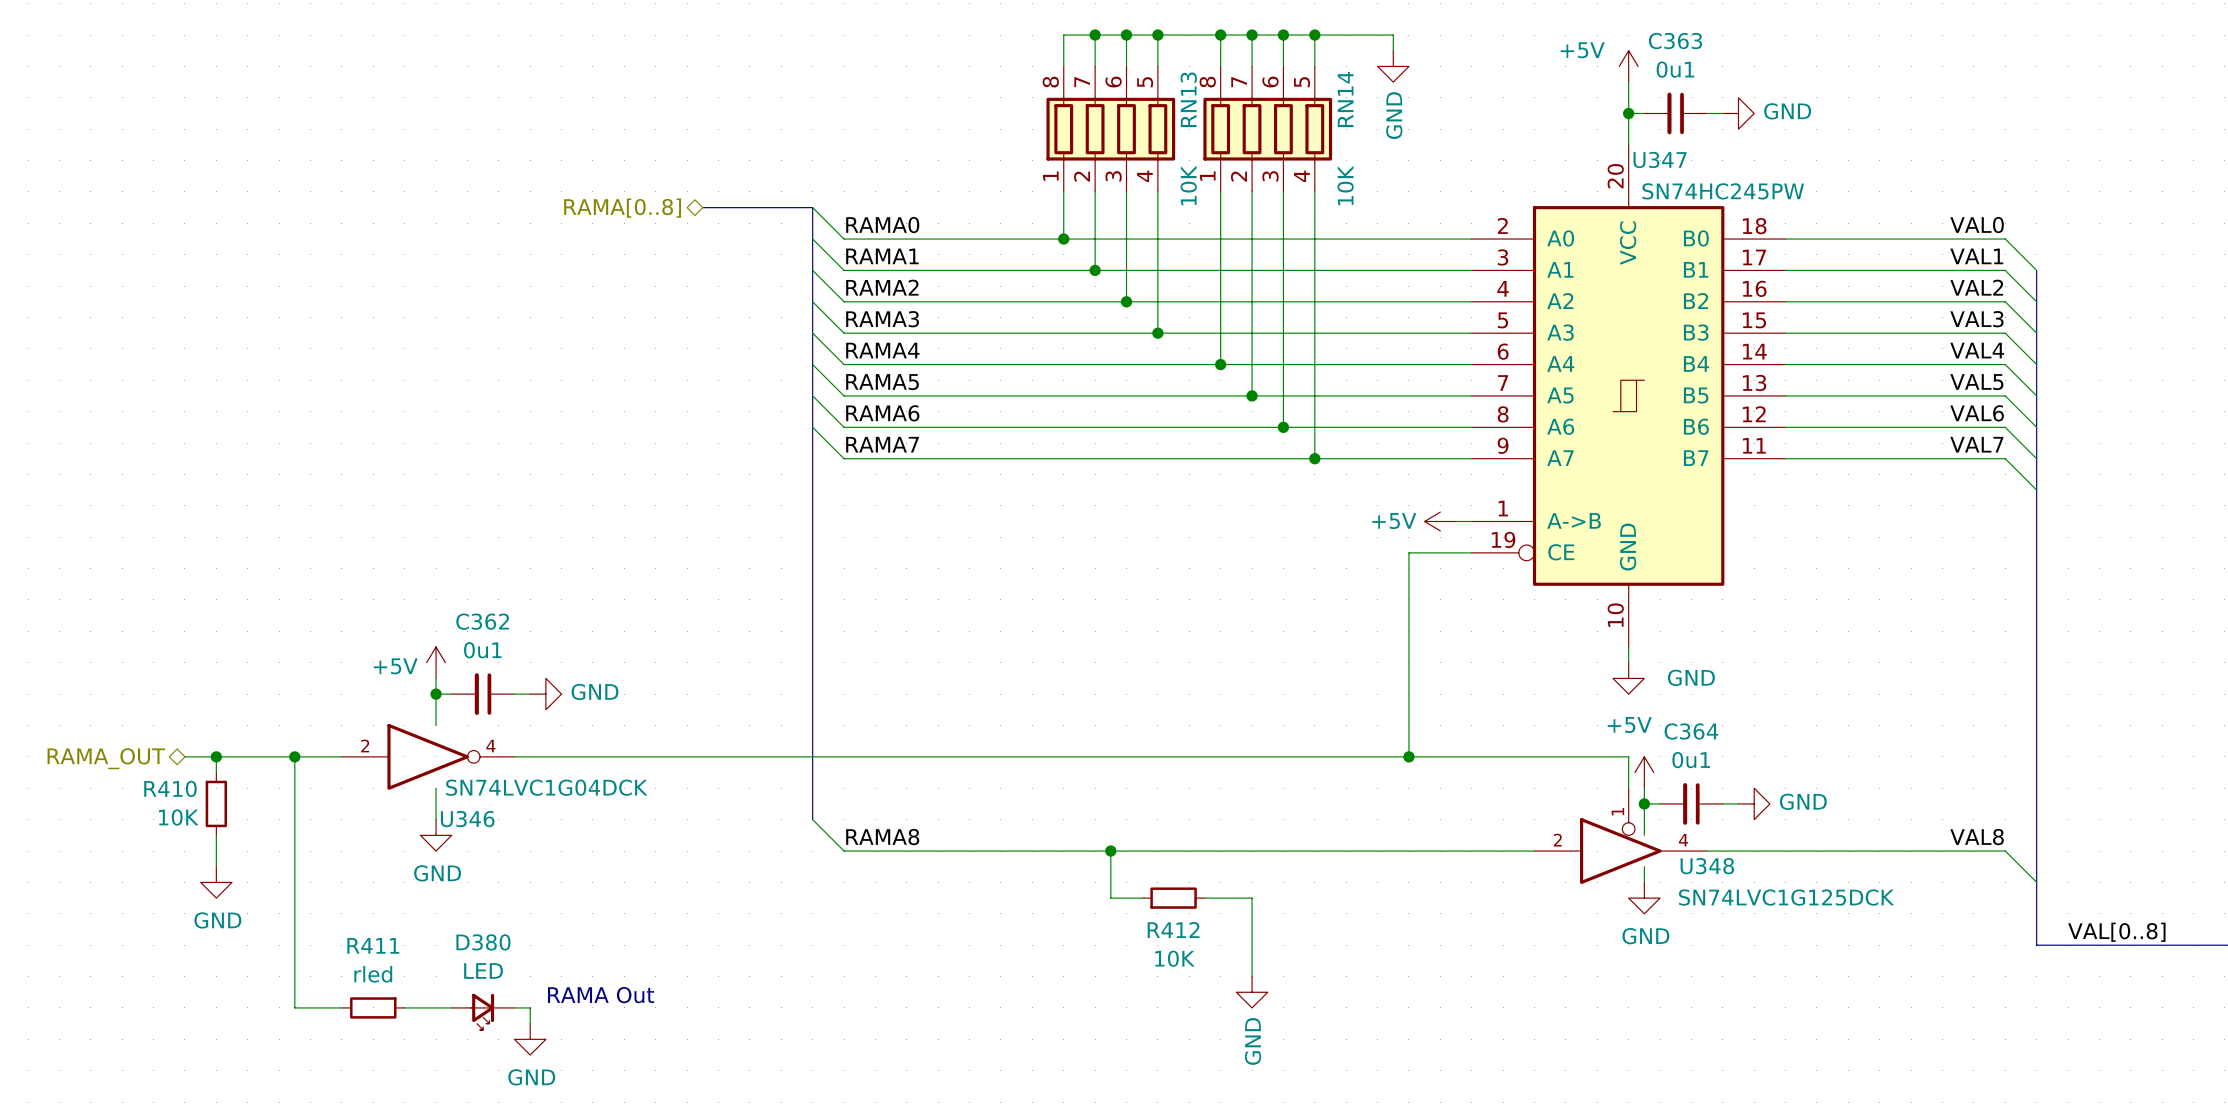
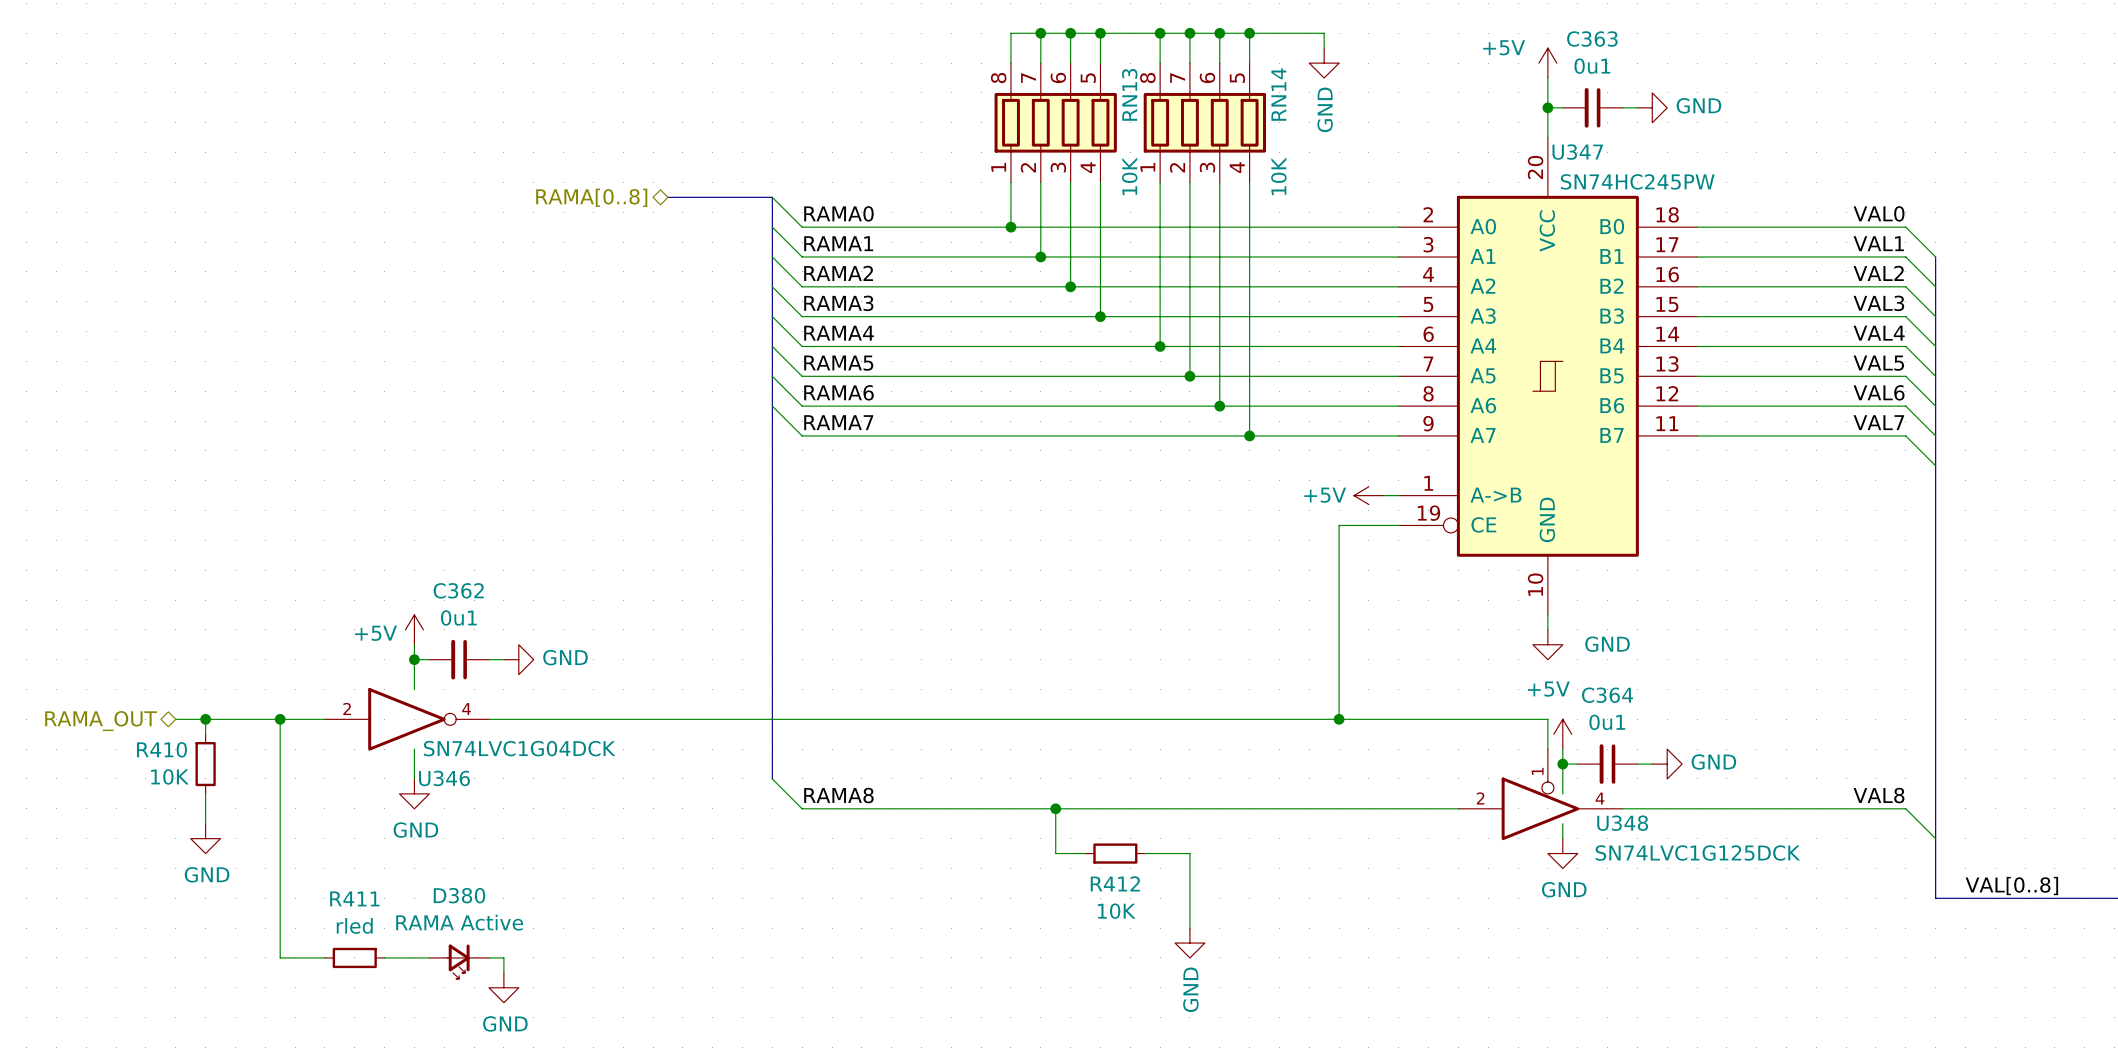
D380 value: LED (483, 970) -> RAMA Active (459, 922)
text: RAMA Out (601, 995) -> none

